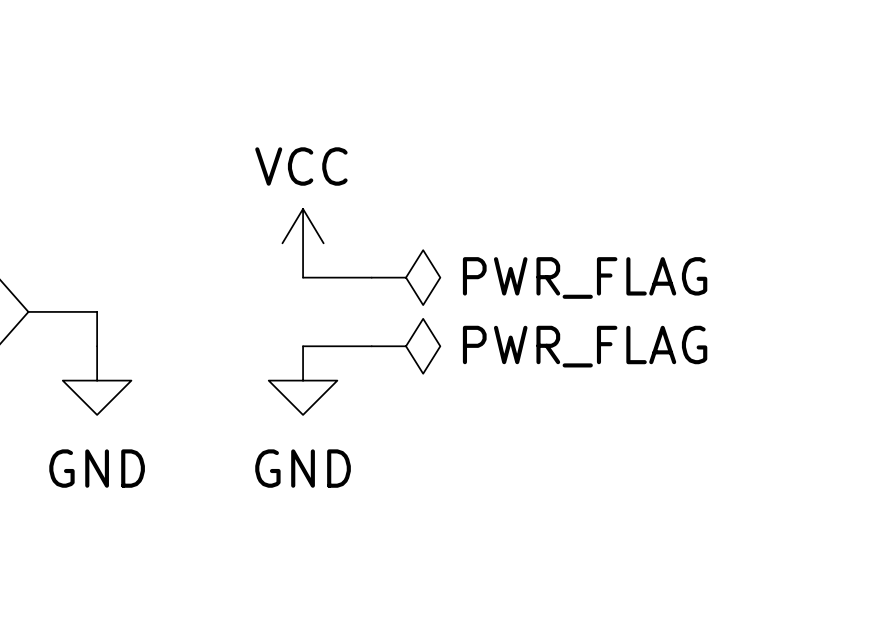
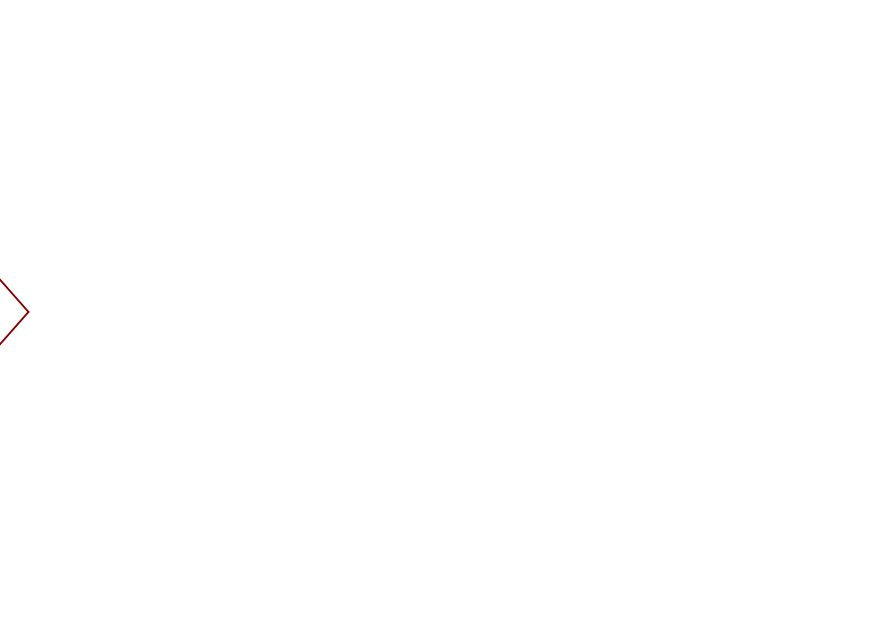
power symbol: VCC (303, 243) -> none
wire: (303, 277) (371, 277) -> none
power symbol: PWR_FLAG (406, 277) -> none
wire: (28, 311) (97, 311) (97, 346) -> none
wire: (303, 346) (371, 346) -> none
power symbol: PWR_FLAG (406, 346) -> none
power symbol: GND (97, 380) -> none
power symbol: GND (303, 380) -> none

